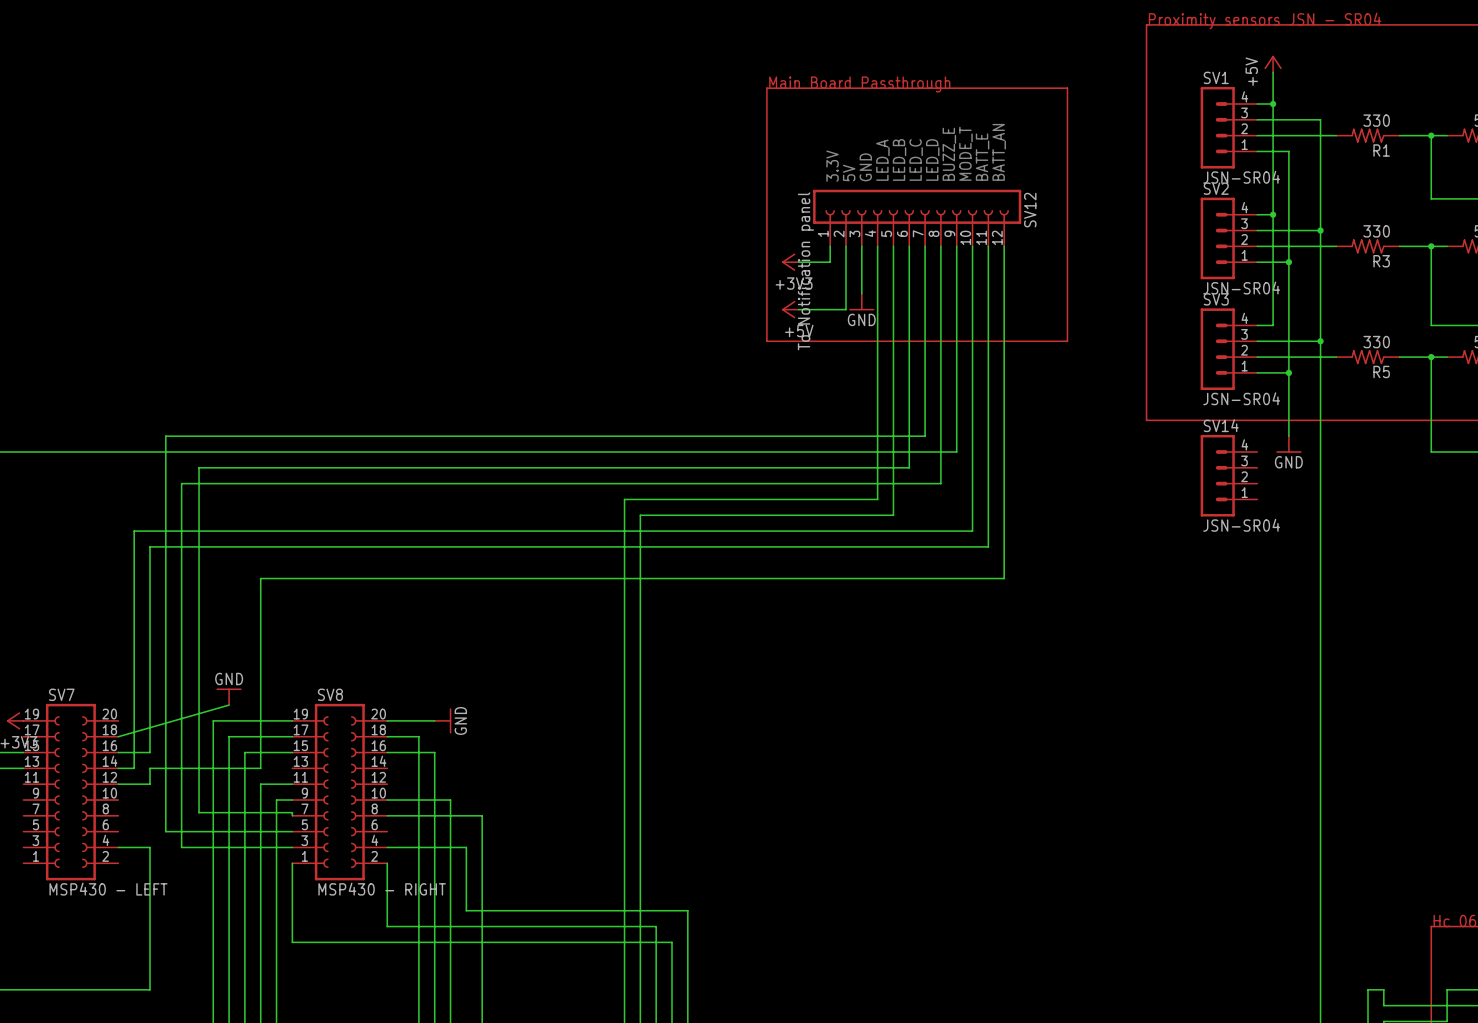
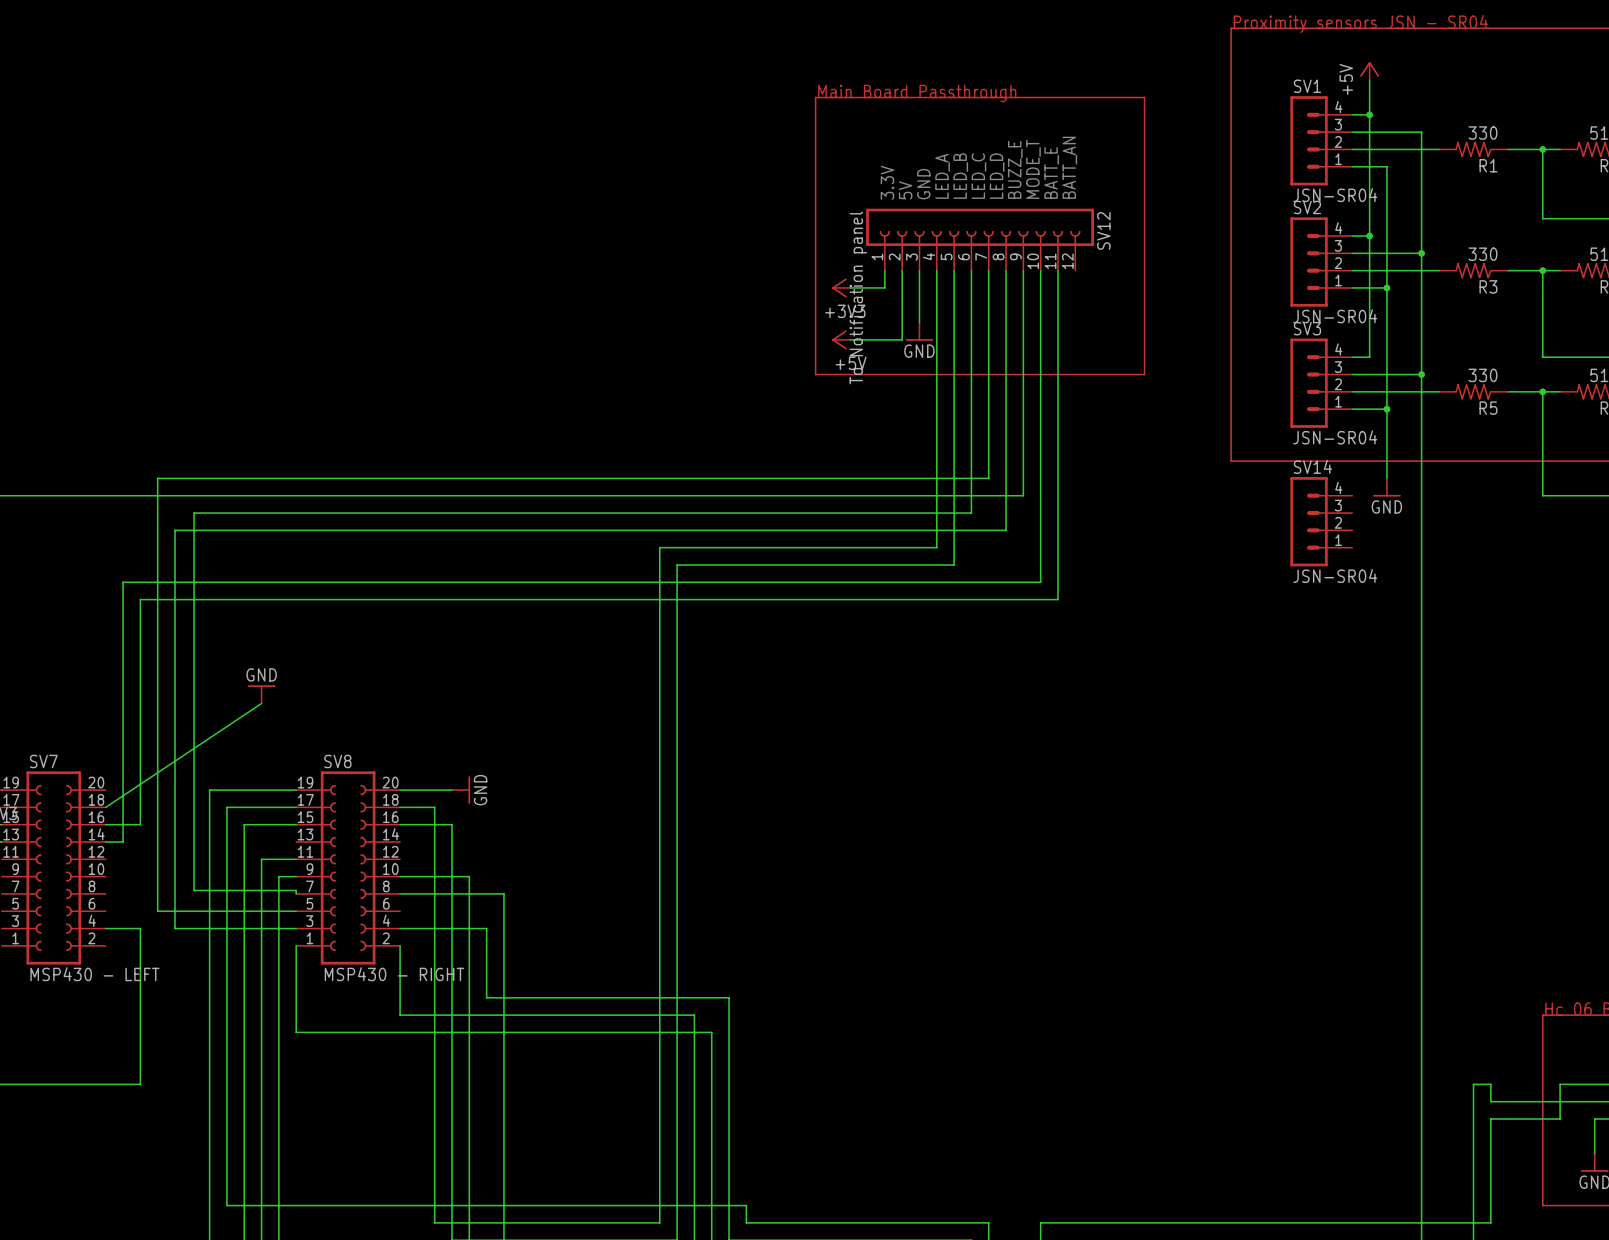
wire: (1004, 246) (1004, 578) (260, 578) (260, 768) (149, 768) (149, 784) (118, 784) -> none
power symbol position: GND (229, 696) -> GND (261, 694)
wire: (229, 705) (118, 736) -> (261, 703) (105, 807)

